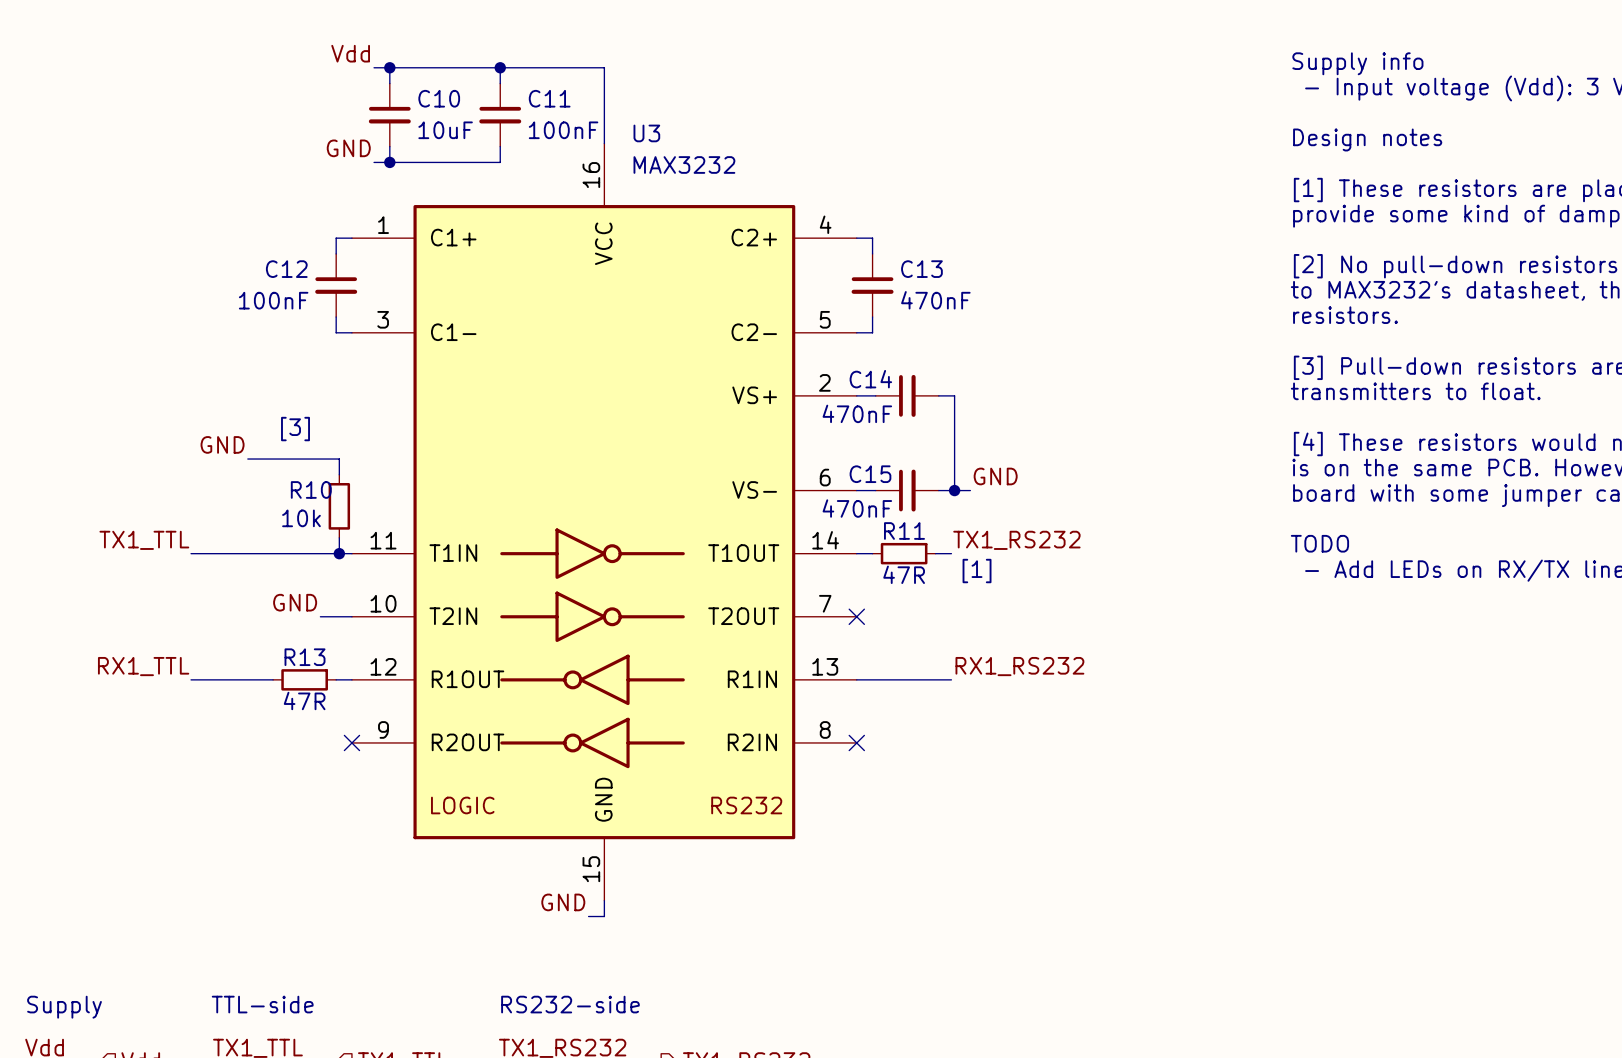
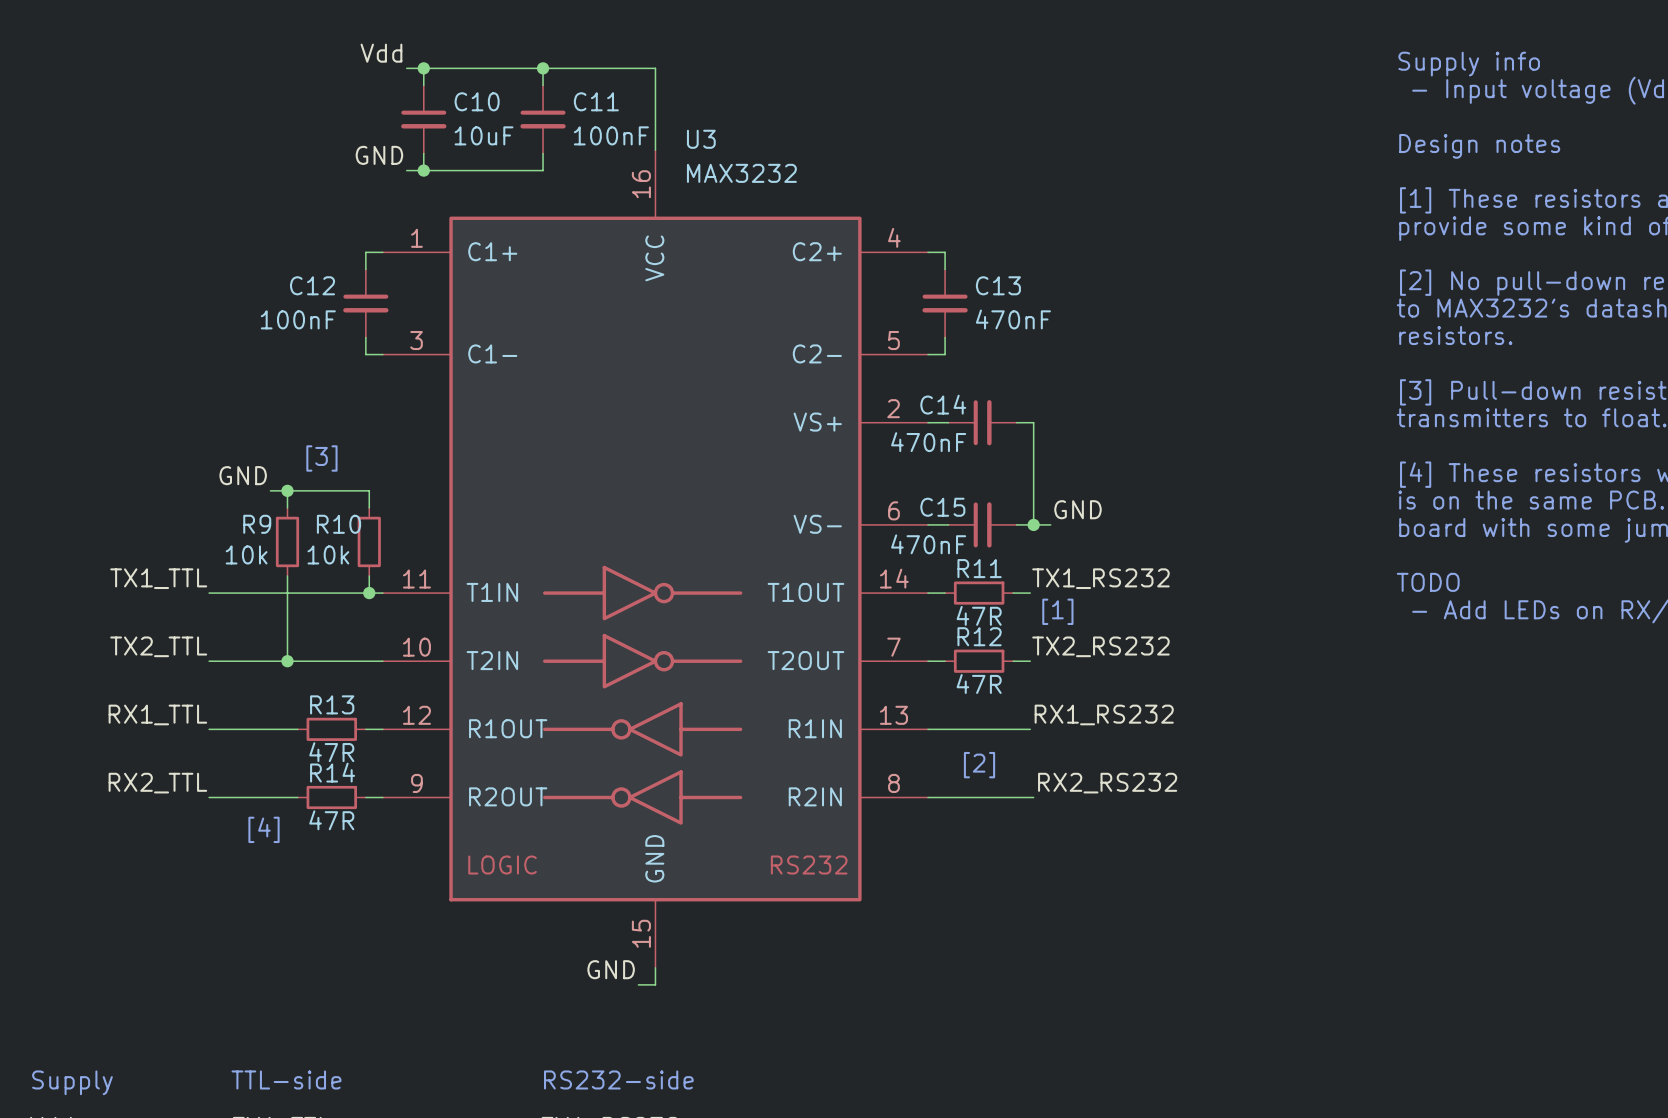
wire: none -> (287, 490) (287, 507)
junction: none -> (287, 490)
R9: none -> 10k (287, 541)
wire: none -> (287, 576) (287, 661)
label: GND (295, 602) -> none
label: none -> TX2_TTL (158, 646)
label: none -> TX2_RS232 (1100, 646)
wire: none -> (209, 661) (348, 661)
junction: none -> (287, 661)
wire: none -> (928, 661) (945, 661)
no-connect mark: (856, 616) -> none
R12: none -> 47R (979, 661)
wire: none -> (1013, 661) (1030, 661)
text: none -> [2] (979, 765)
label: none -> RX2_TTL (157, 783)
label: none -> RX2_RS232 (1107, 783)
wire: none -> (209, 797) (297, 797)
R14: none -> 47R (331, 797)
wire: none -> (365, 797) (382, 797)
no-connect mark: (351, 742) -> none
wire: none -> (928, 797) (1033, 797)
no-connect mark: (856, 742) -> none
text: none -> [4] (264, 829)

